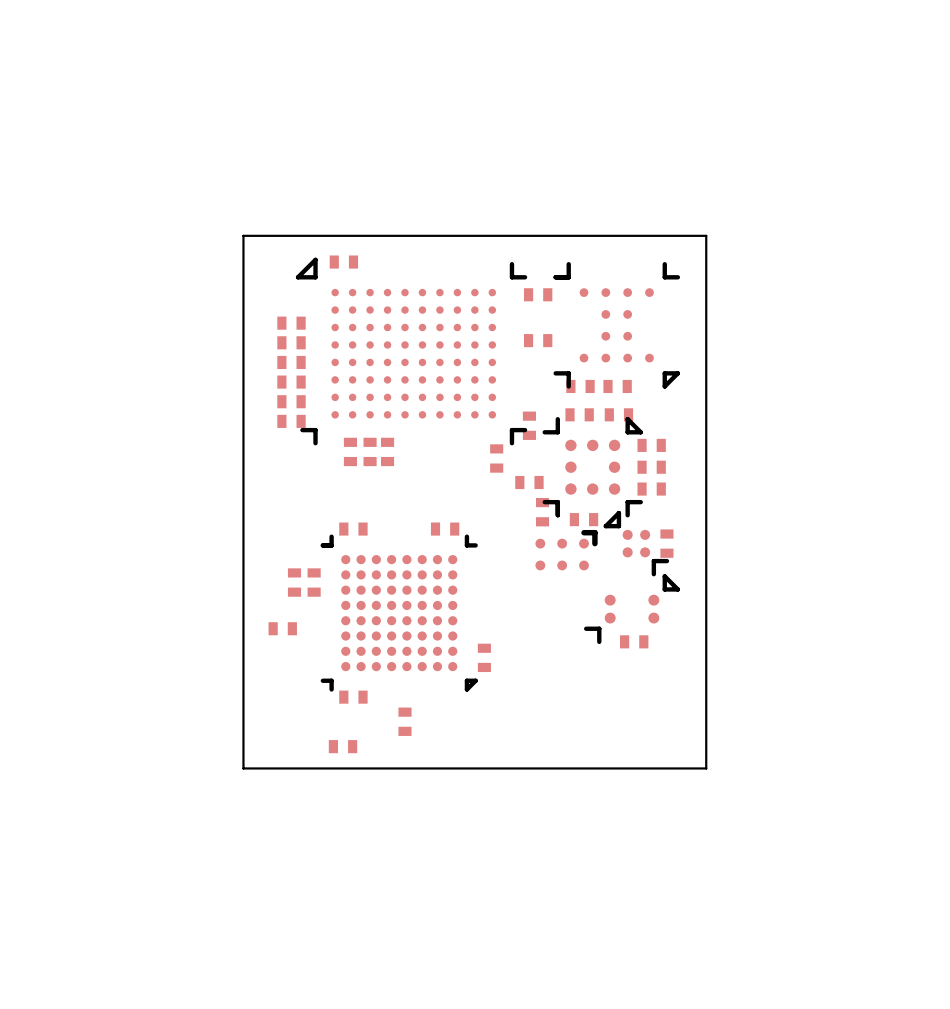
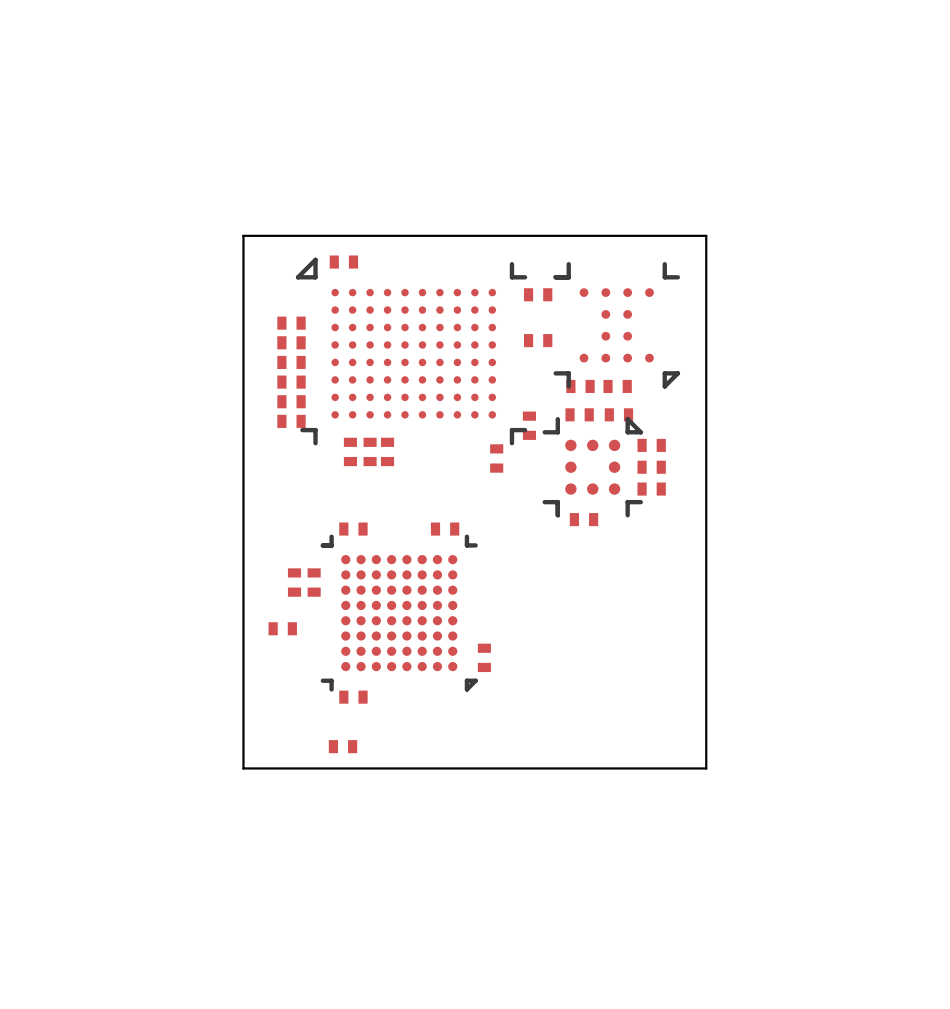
part: (529, 482) -> none
part: (542, 512) -> none
part: (636, 543) -> none
part: (666, 543) -> none
part: (566, 550) -> none
part: (632, 609) -> none
part: (634, 641) -> none
part: (405, 721) -> none

